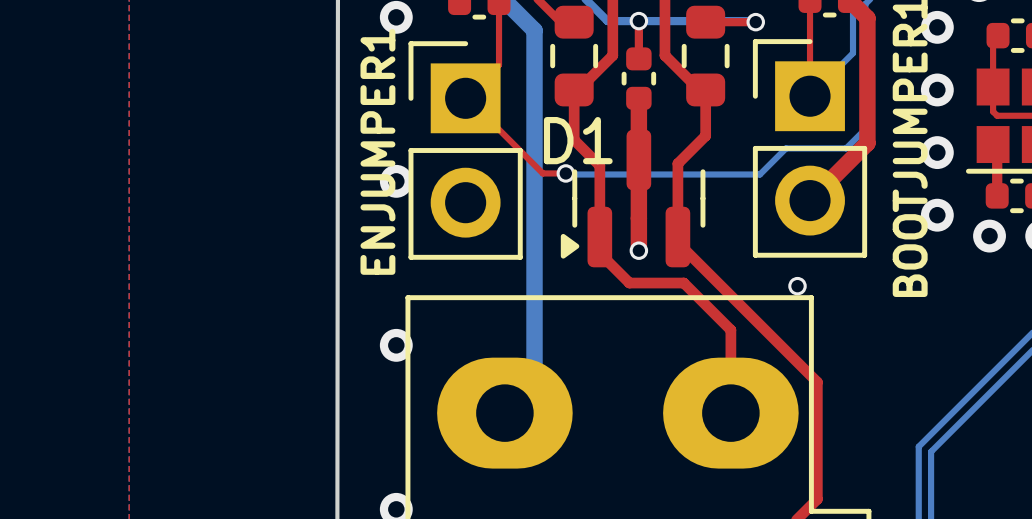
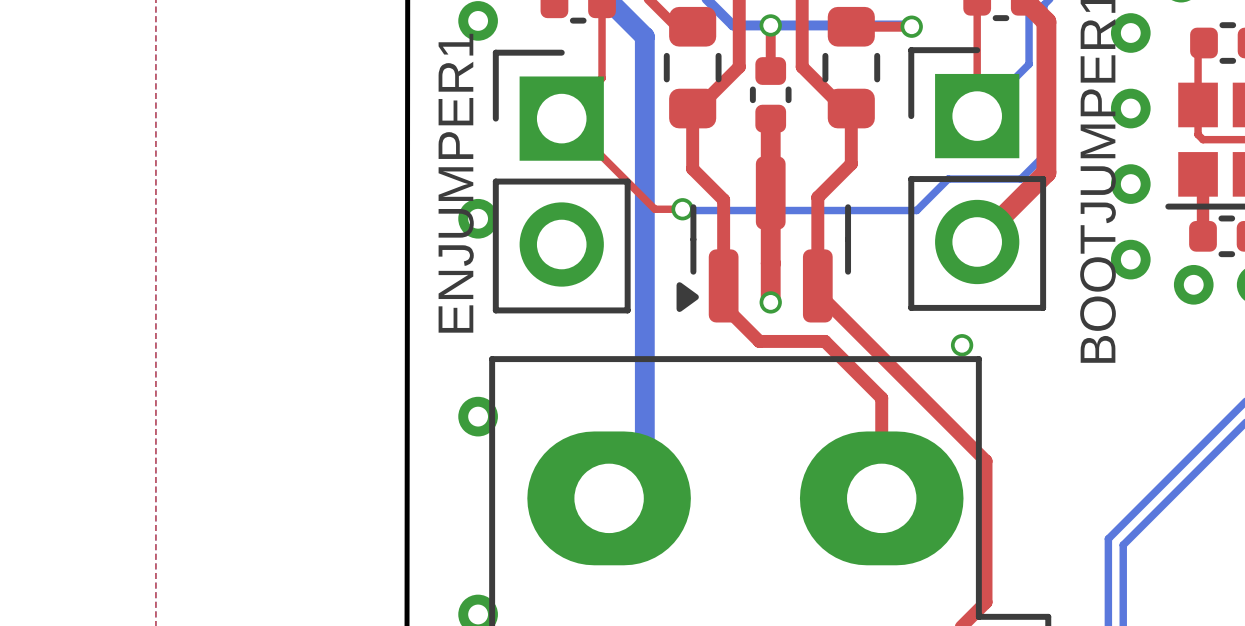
D1 name: D1 (578, 140) -> none

